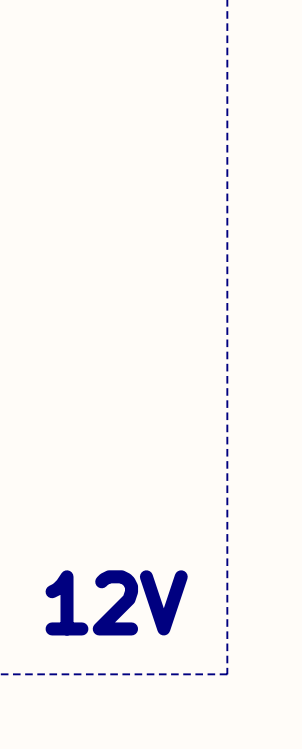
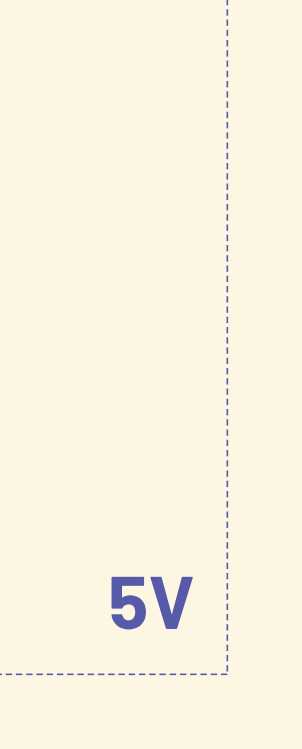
text: 12V (116, 602) -> 5V (152, 603)

